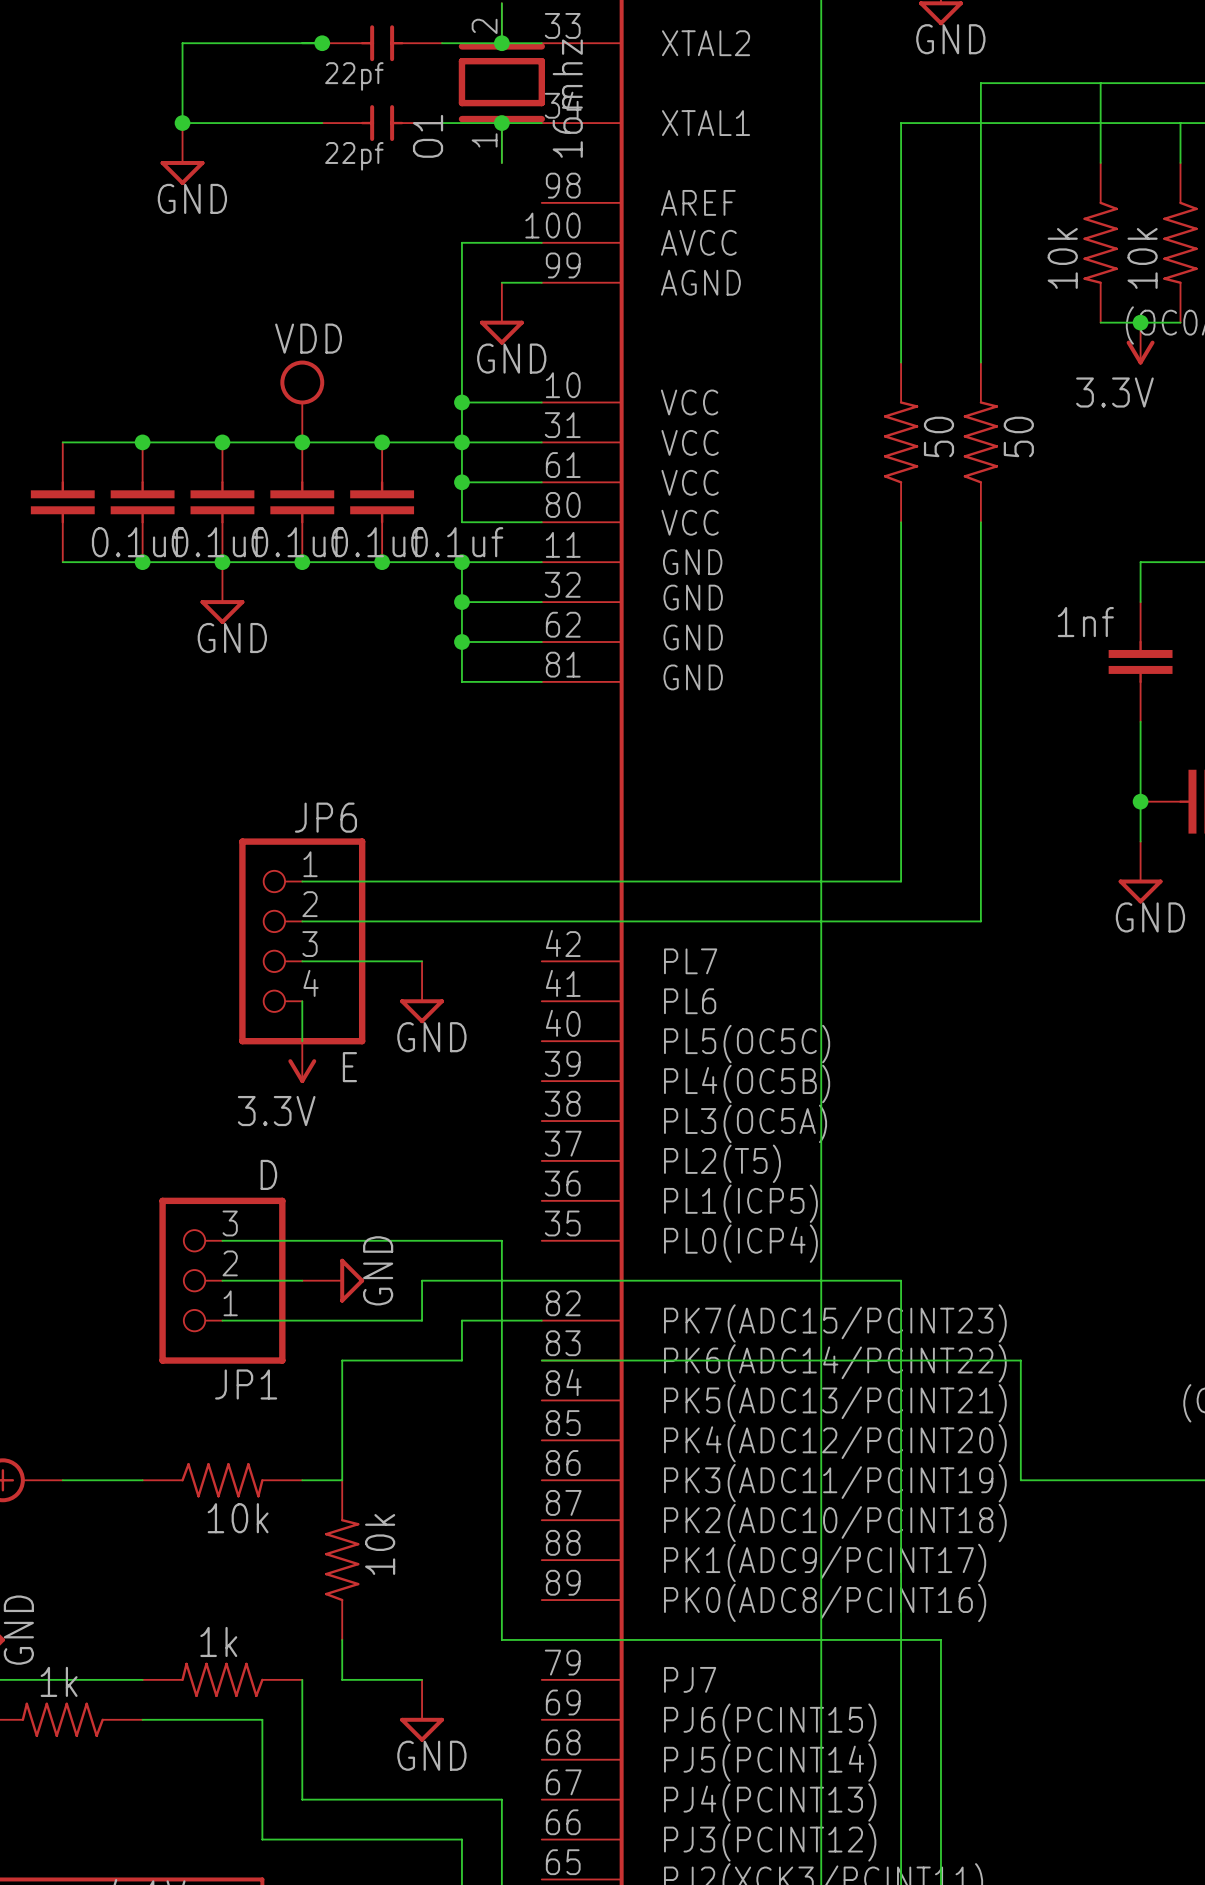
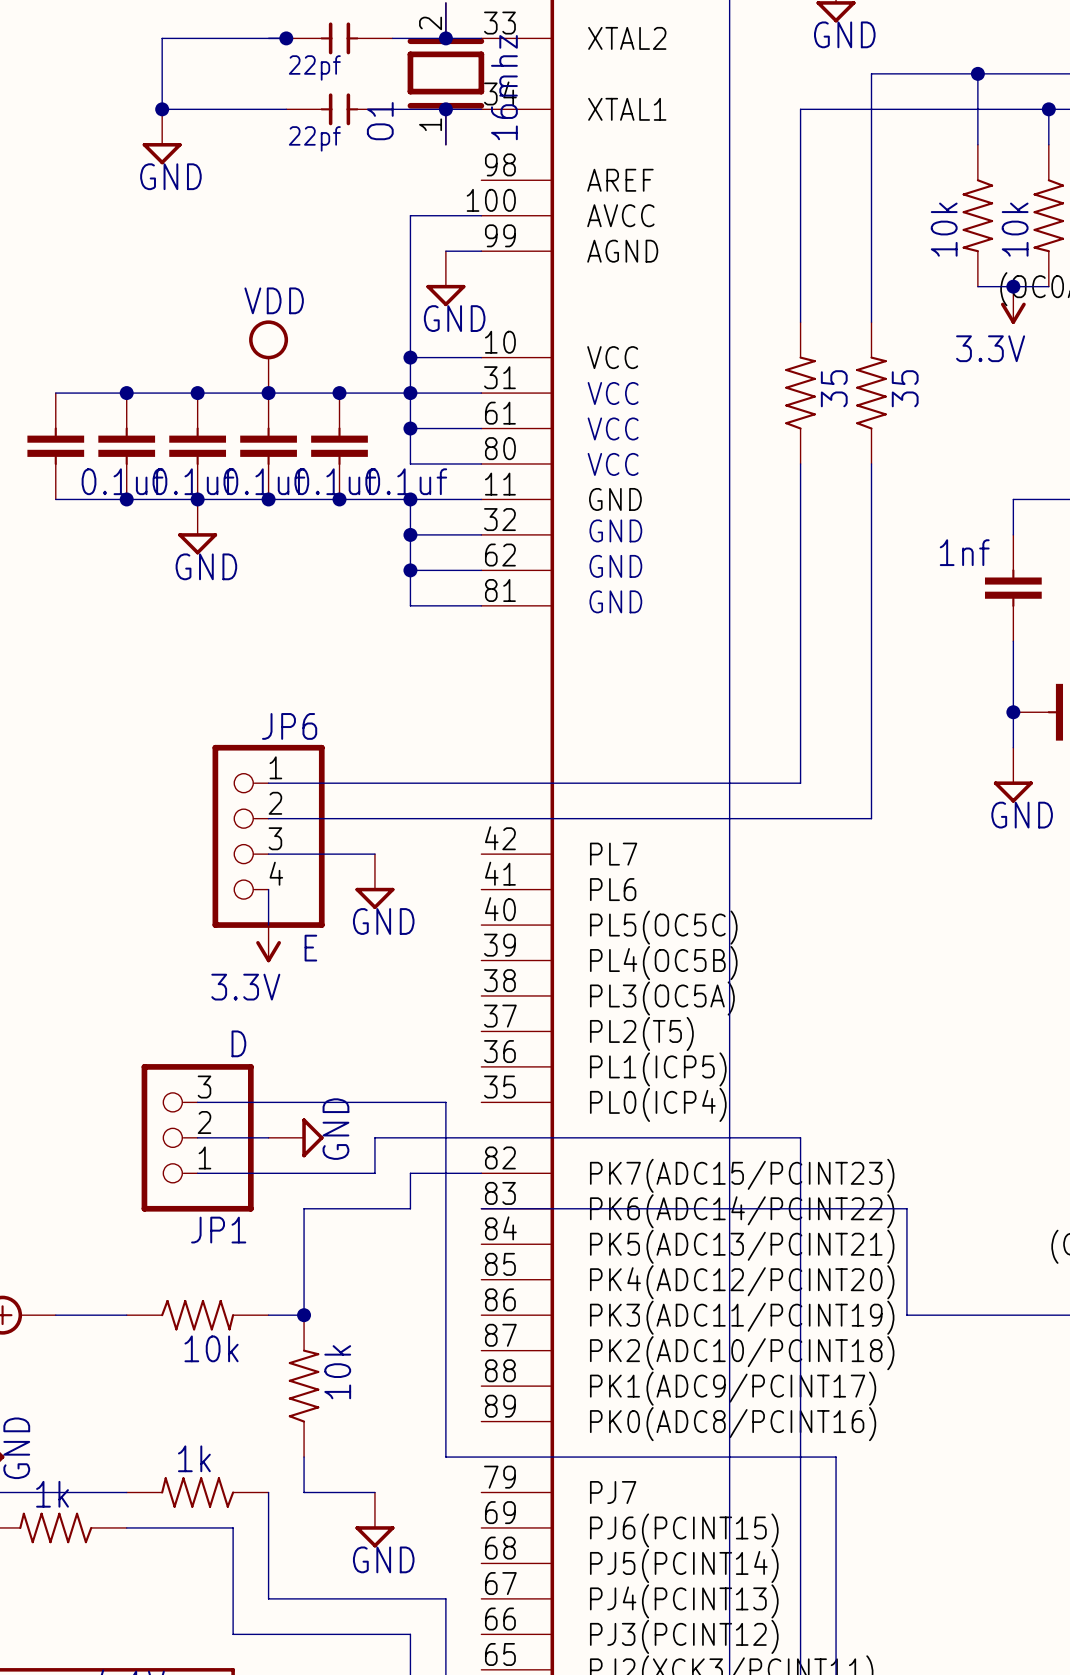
junction: none -> (977, 73)
junction: none -> (1048, 109)
part value: 50 (938, 436) -> 35 (834, 388)
part value: 50 (1018, 436) -> 35 (905, 388)
junction: none -> (304, 1315)

